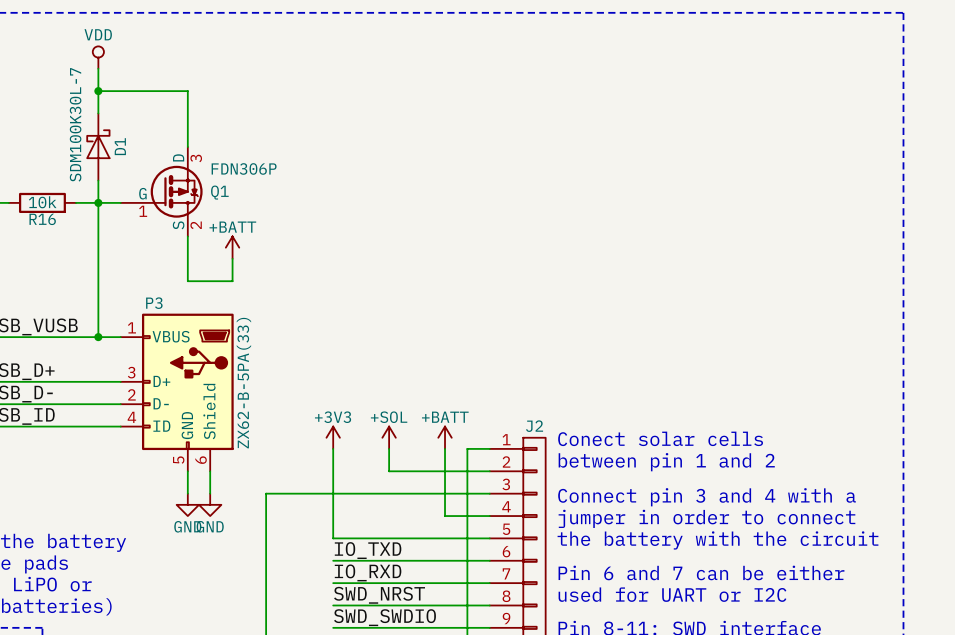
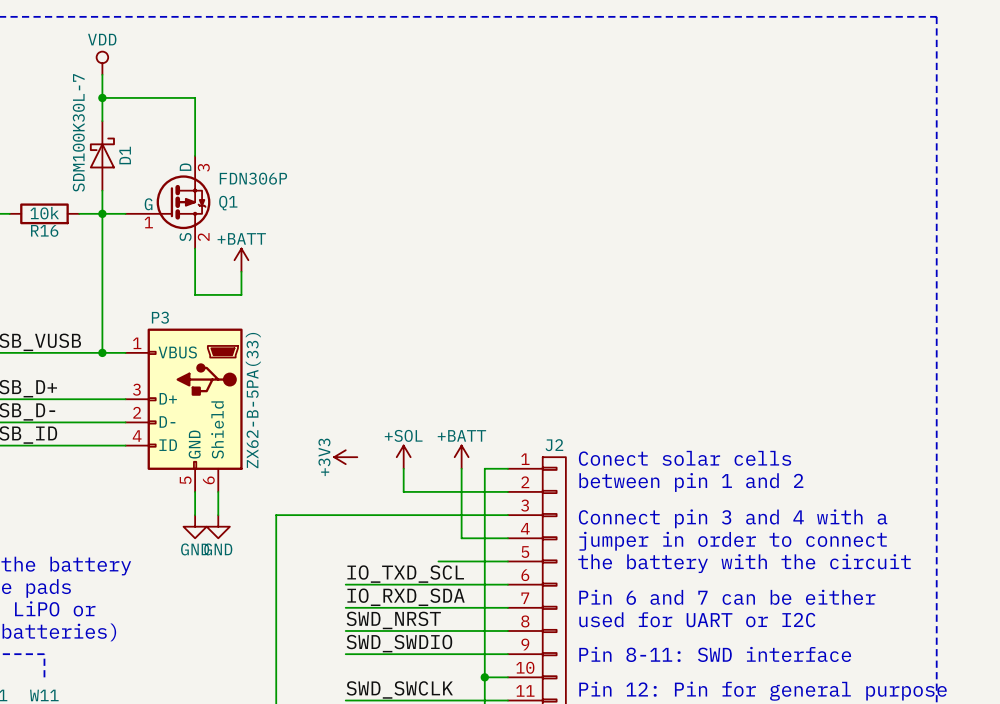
power symbol rotation: 0° (333, 437) -> 90° counterclockwise (345, 457)
wire: (333, 448) (333, 538) (422, 538) -> none
label: IO_TXD (368, 550) -> IO_TXD_SCL (405, 574)
label: IO_RXD (368, 572) -> IO_RXD_SDA (406, 597)

